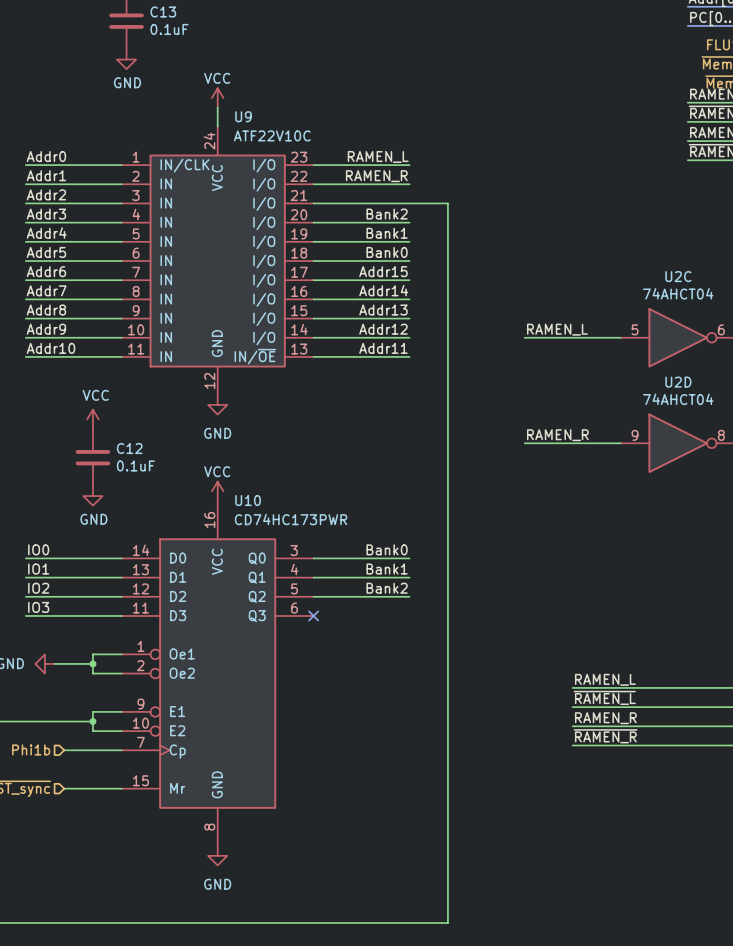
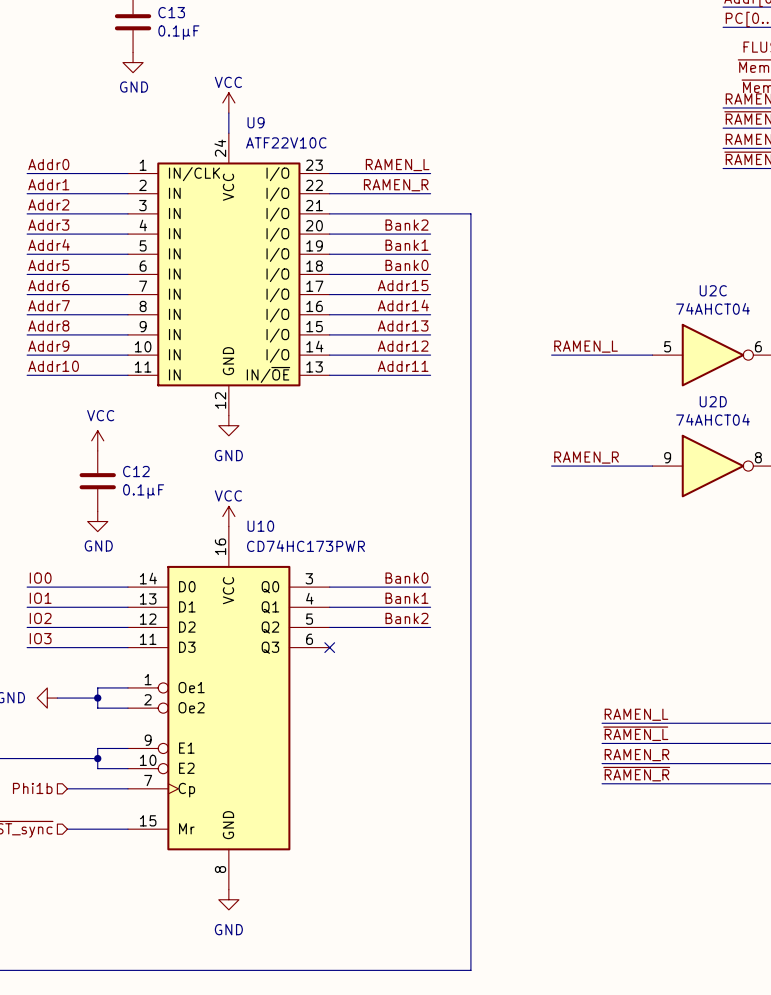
C13 value: 0.1uF (169, 29) -> 0.1μF (178, 32)
C12 value: 0.1uF (135, 465) -> 0.1μF (143, 491)

